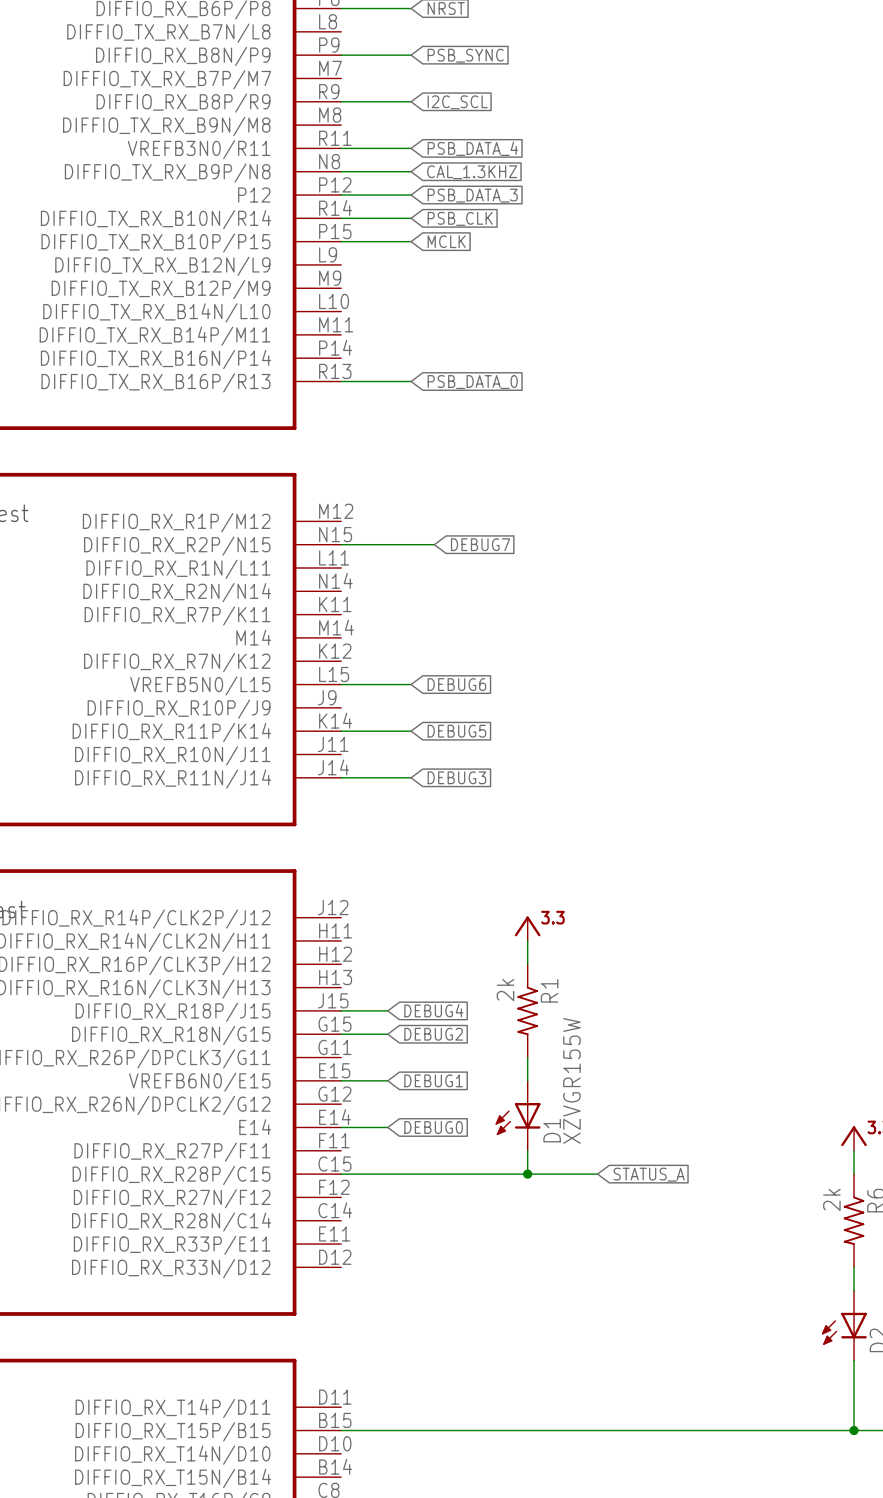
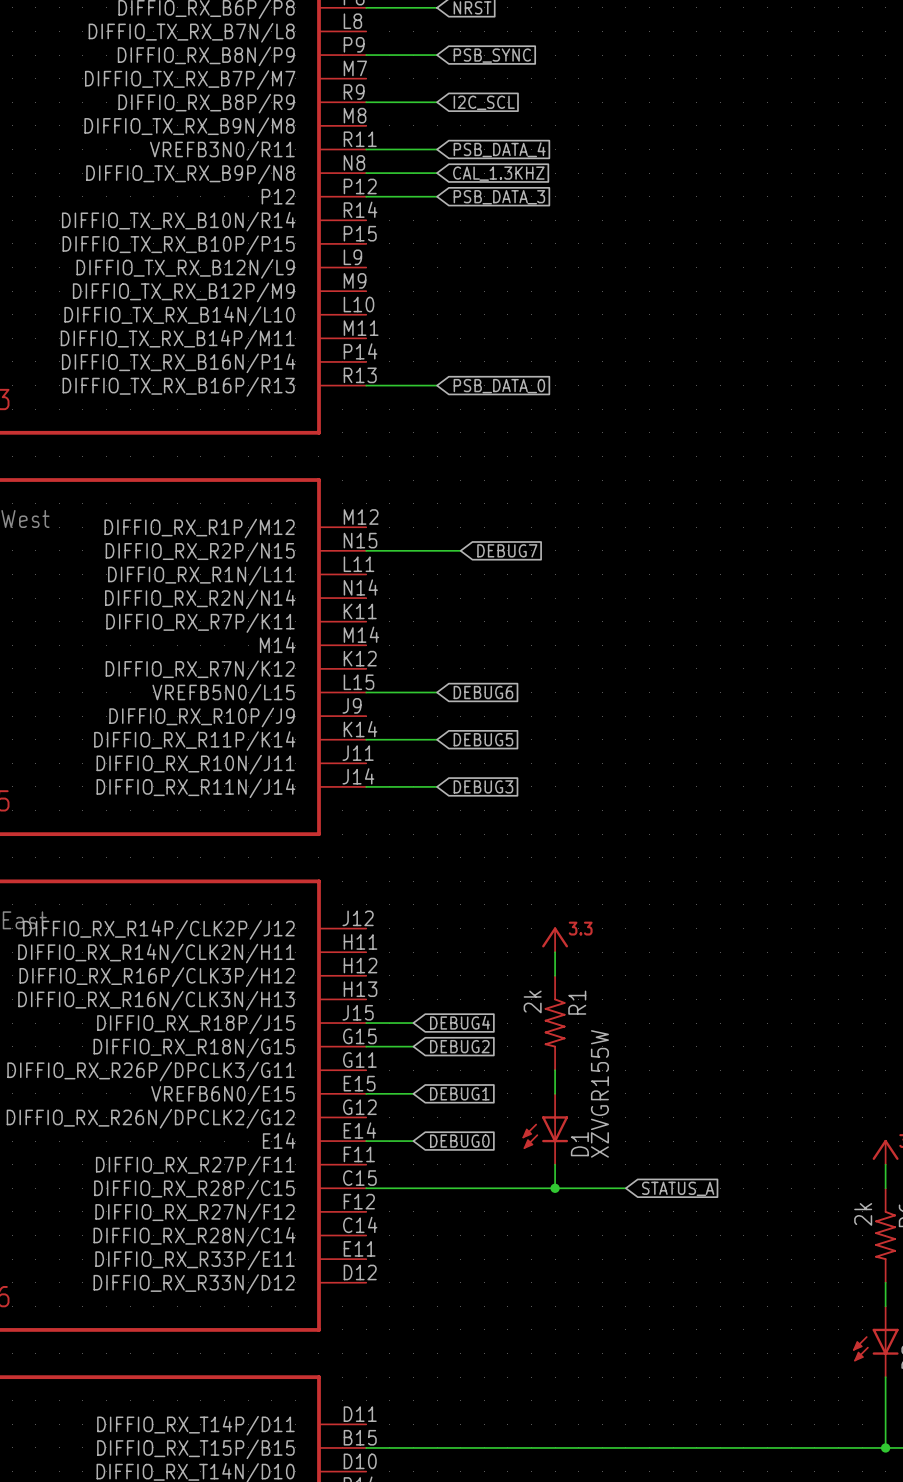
wire: (341, 218) (411, 218) -> none
global label: PSB_CLK (460, 218) -> none
wire: (341, 241) (411, 241) -> none
global label: MCLK (446, 241) -> none

